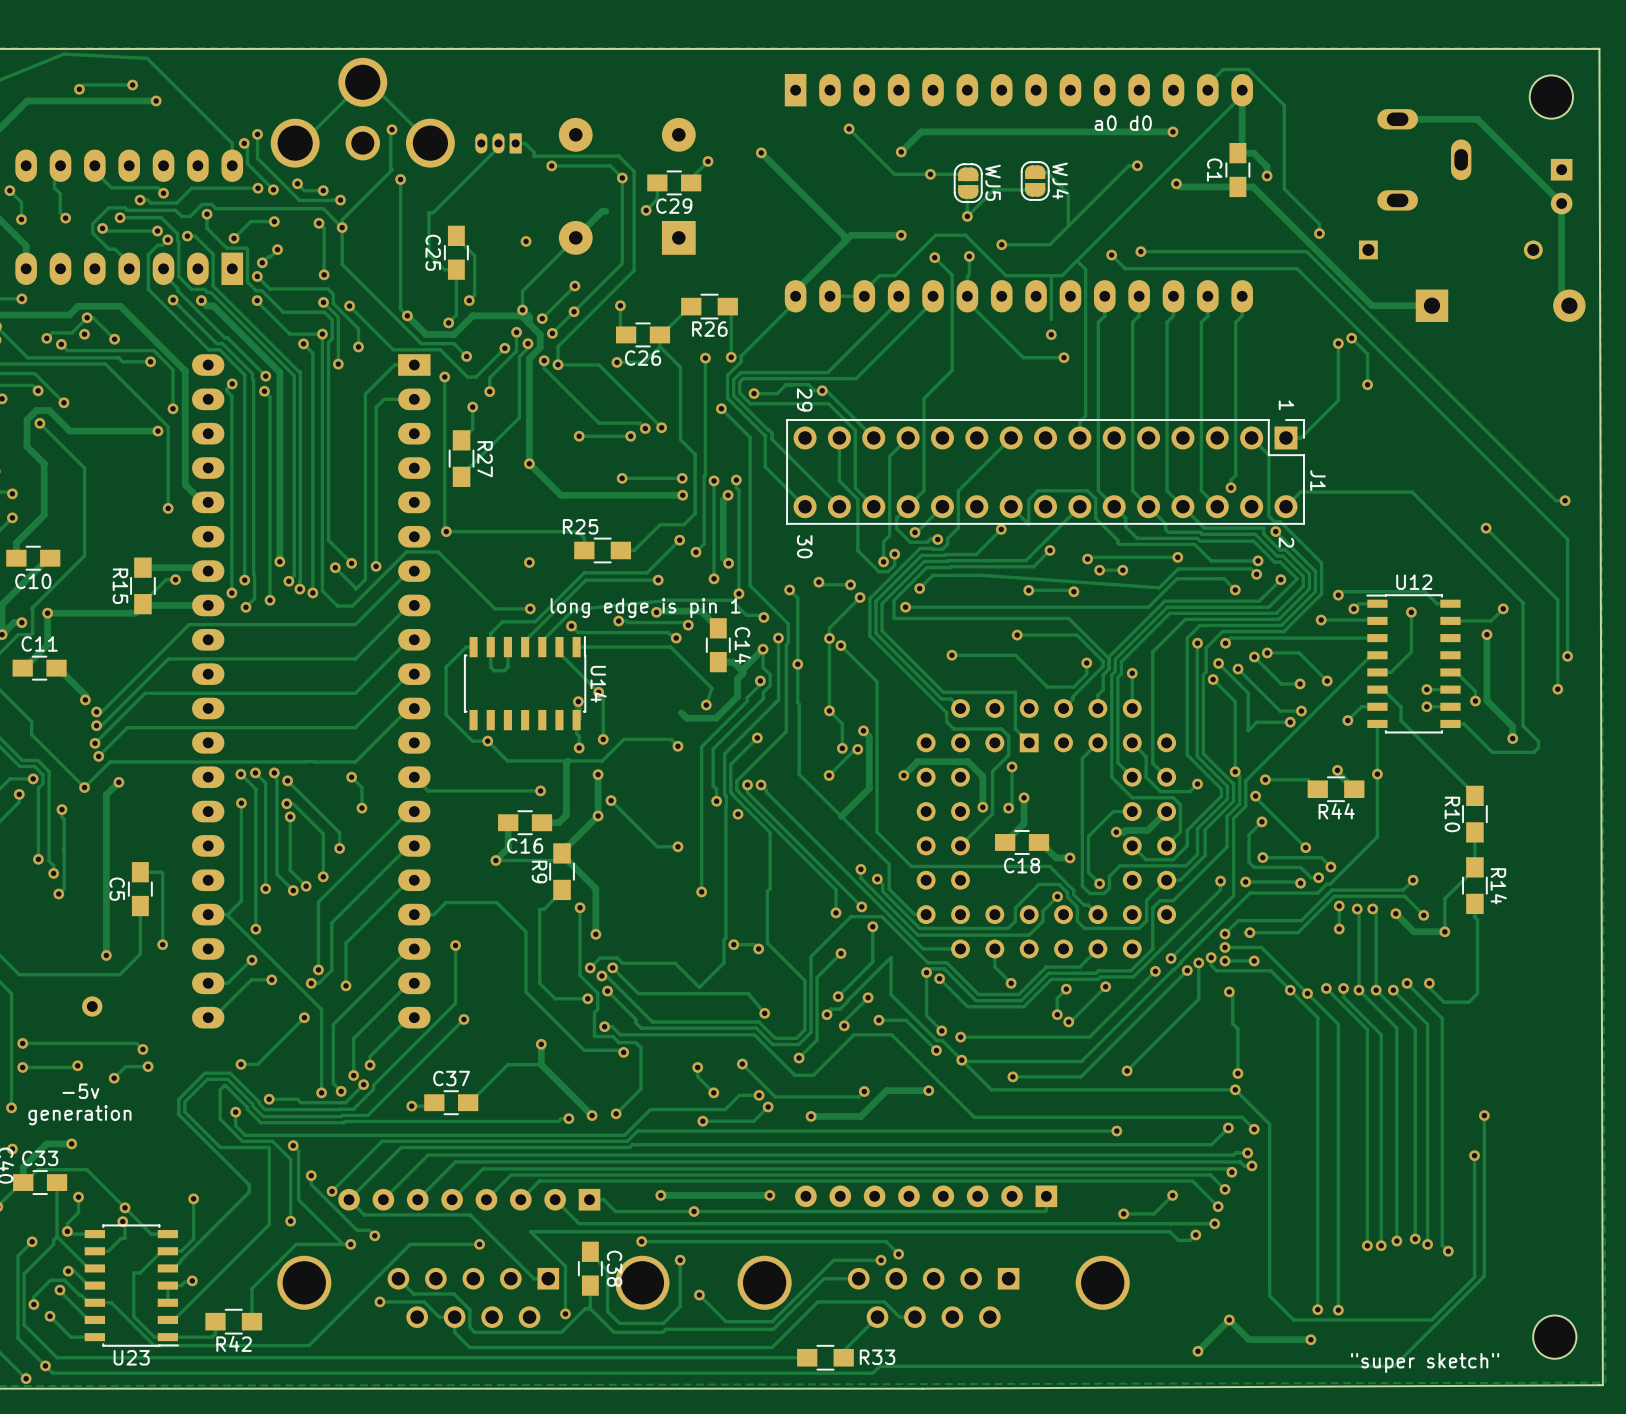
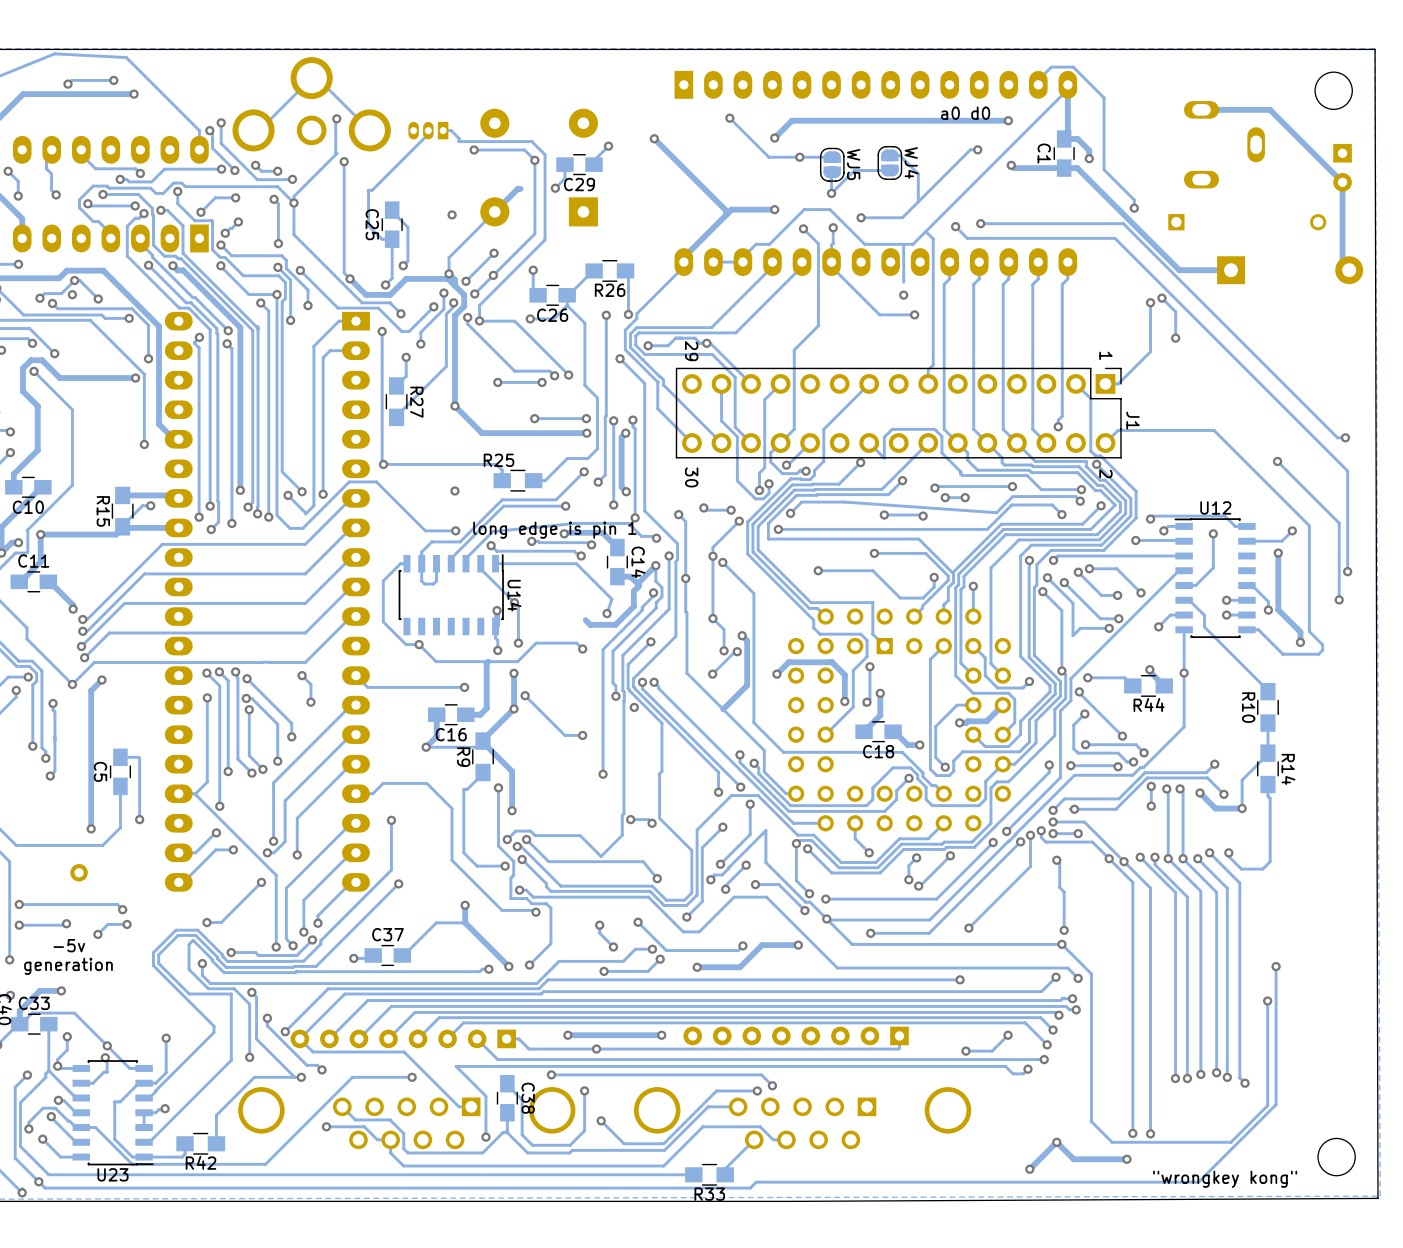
R33 name position: R33 (877, 1357) -> R33 (709, 1194)
text: "super sketch" (1425, 1362) -> "wrongkey kong" (1225, 1179)

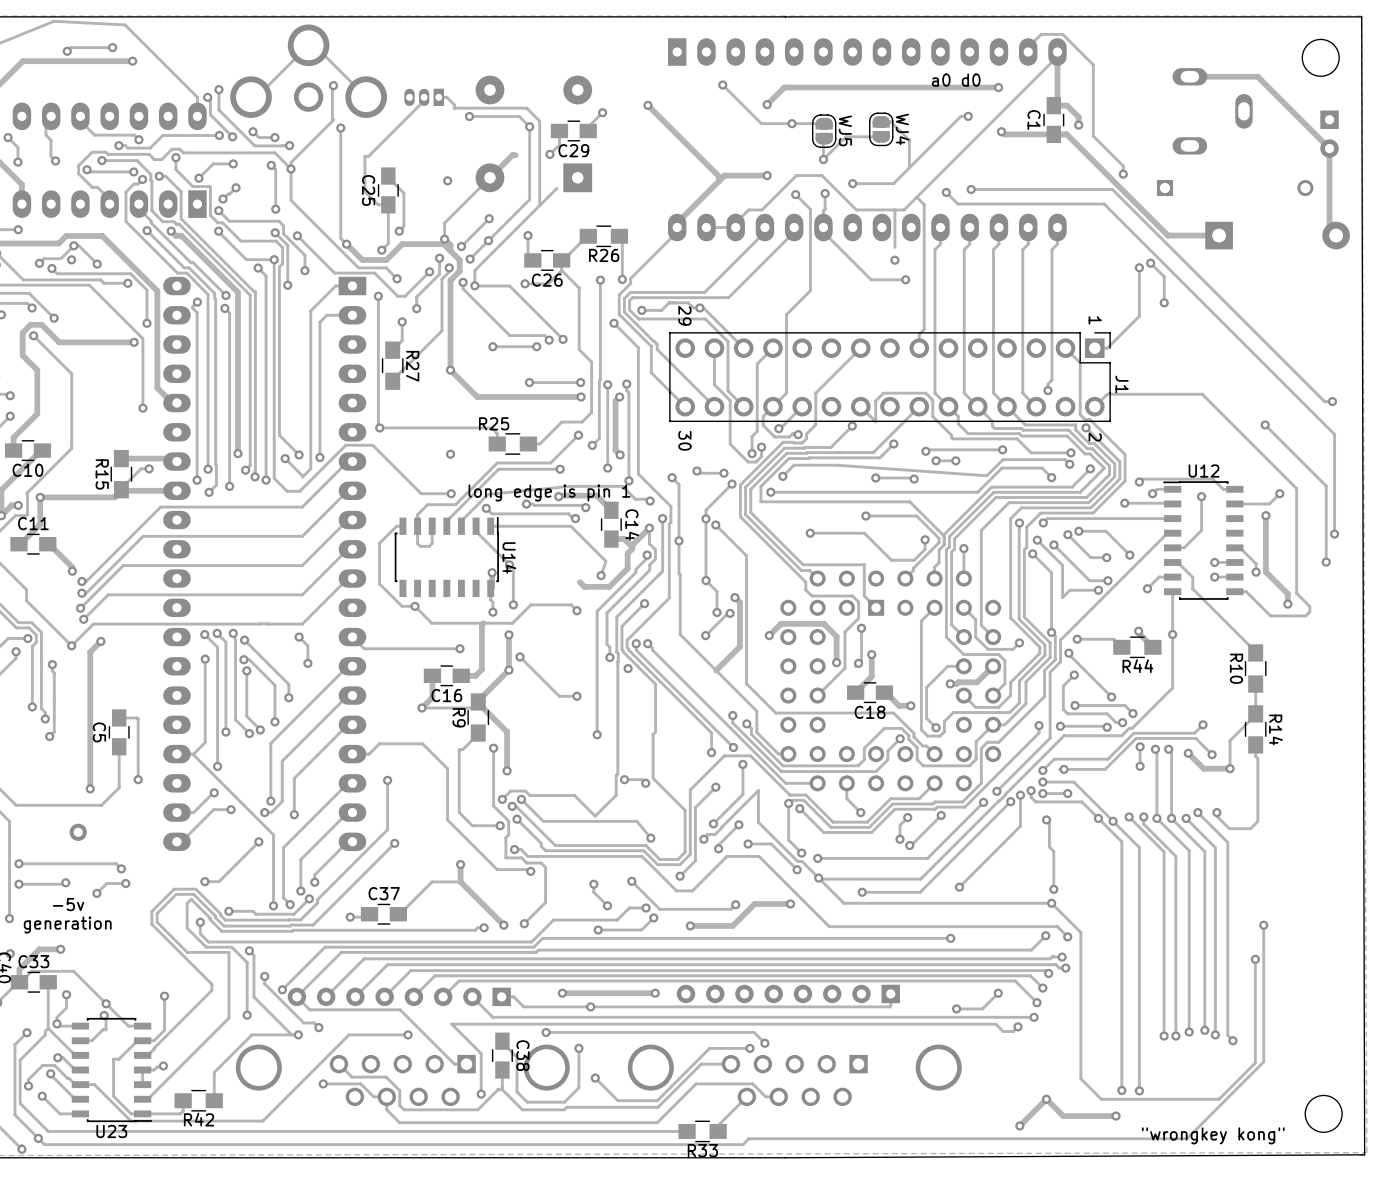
track: none -> (556, 188) (539, 205)

